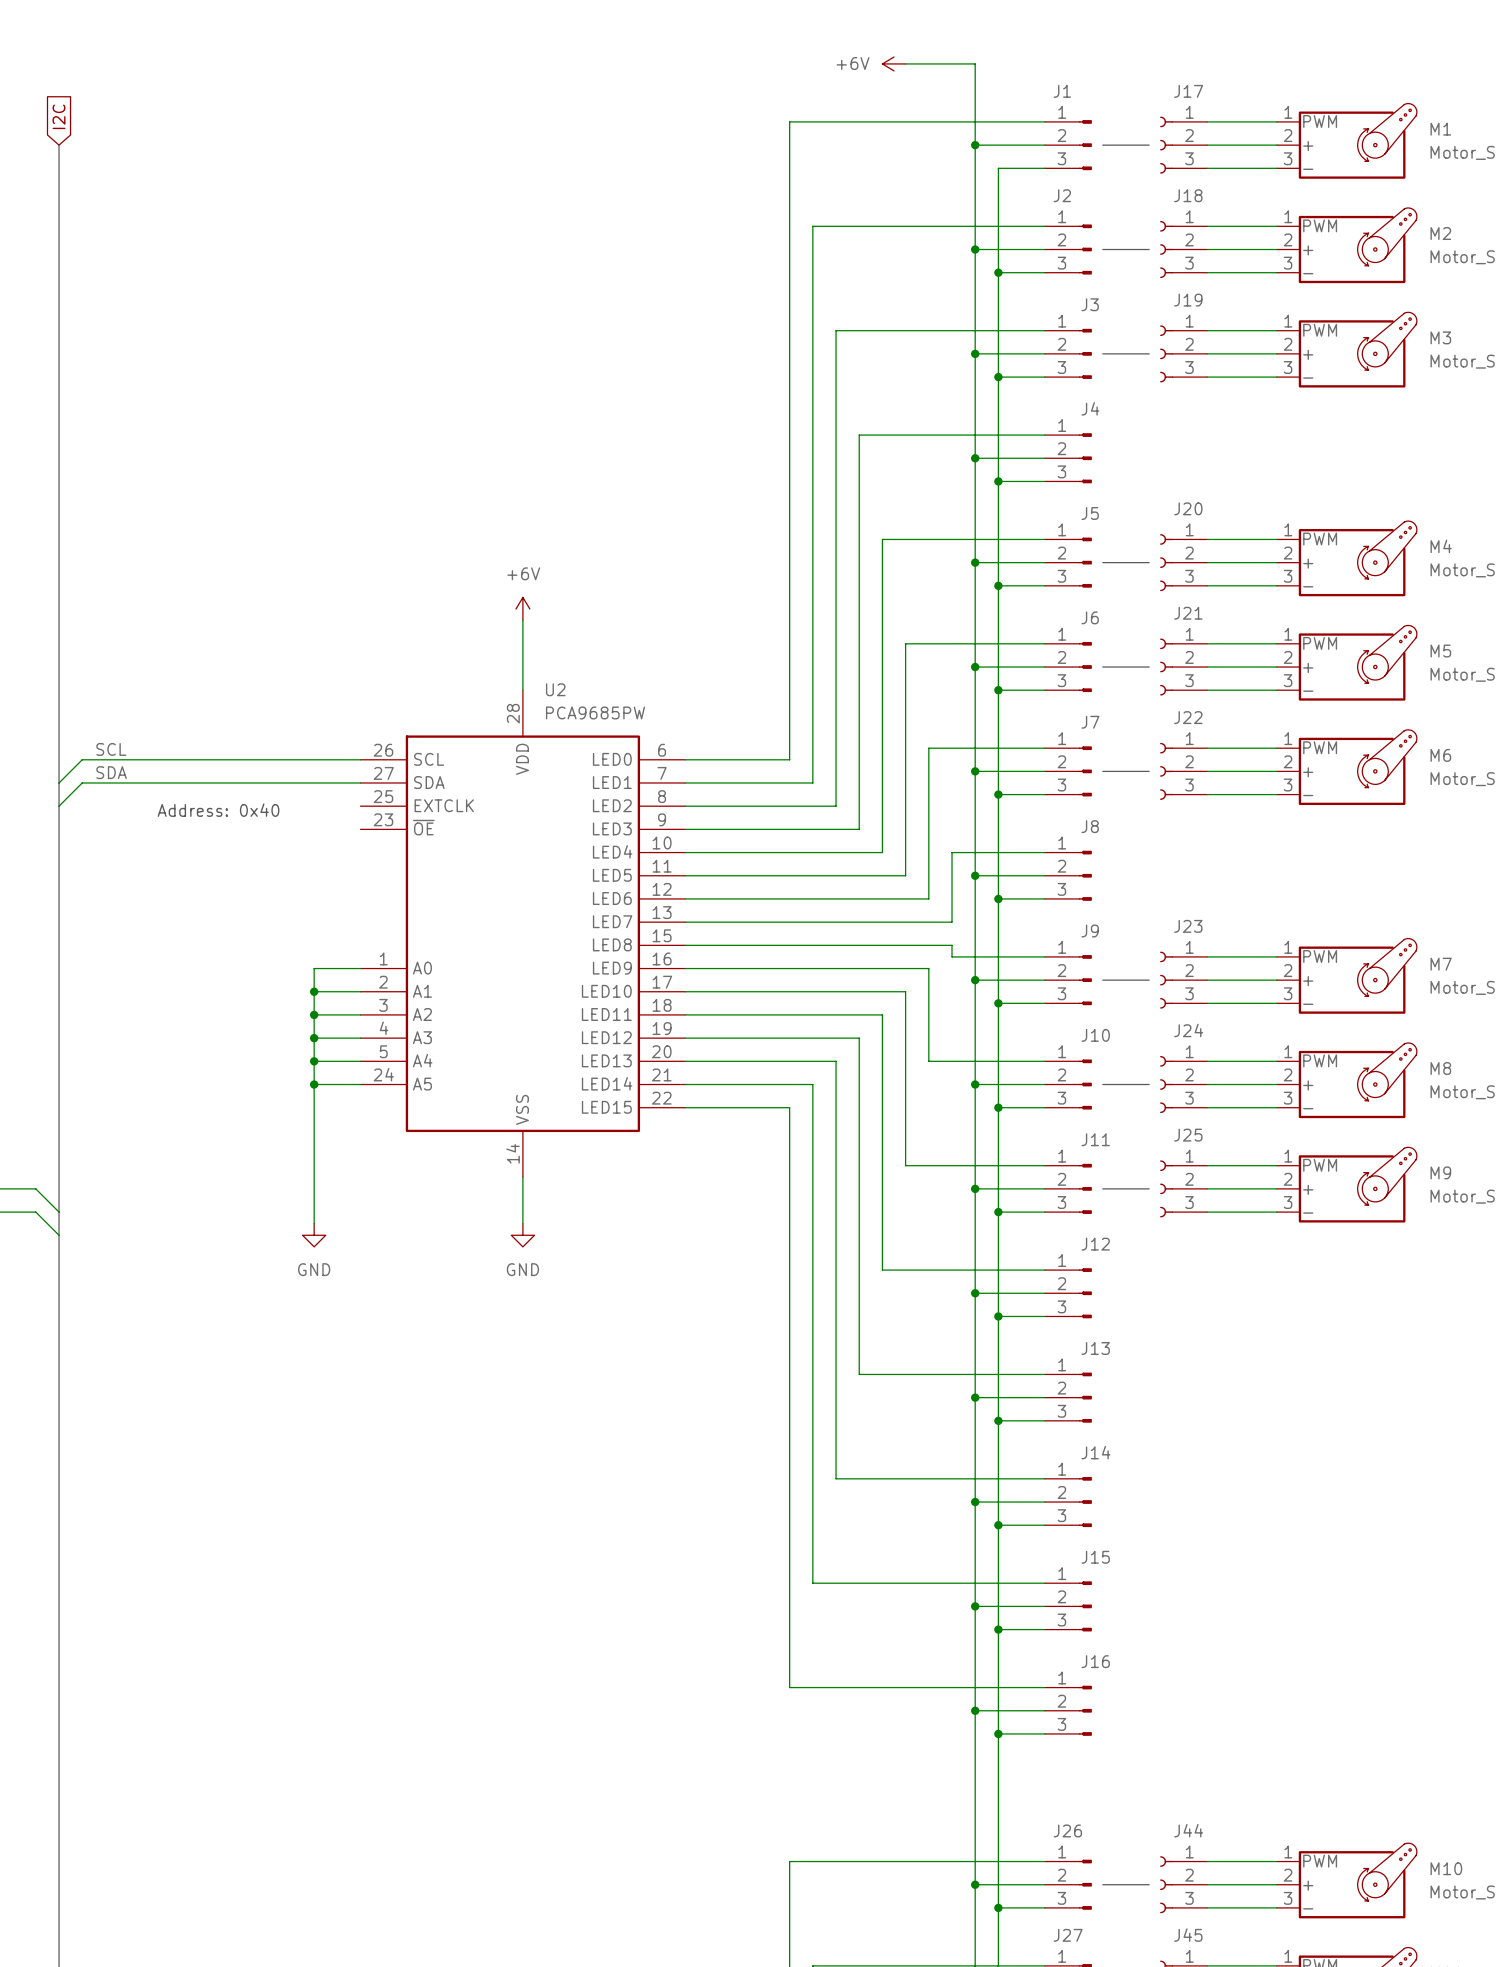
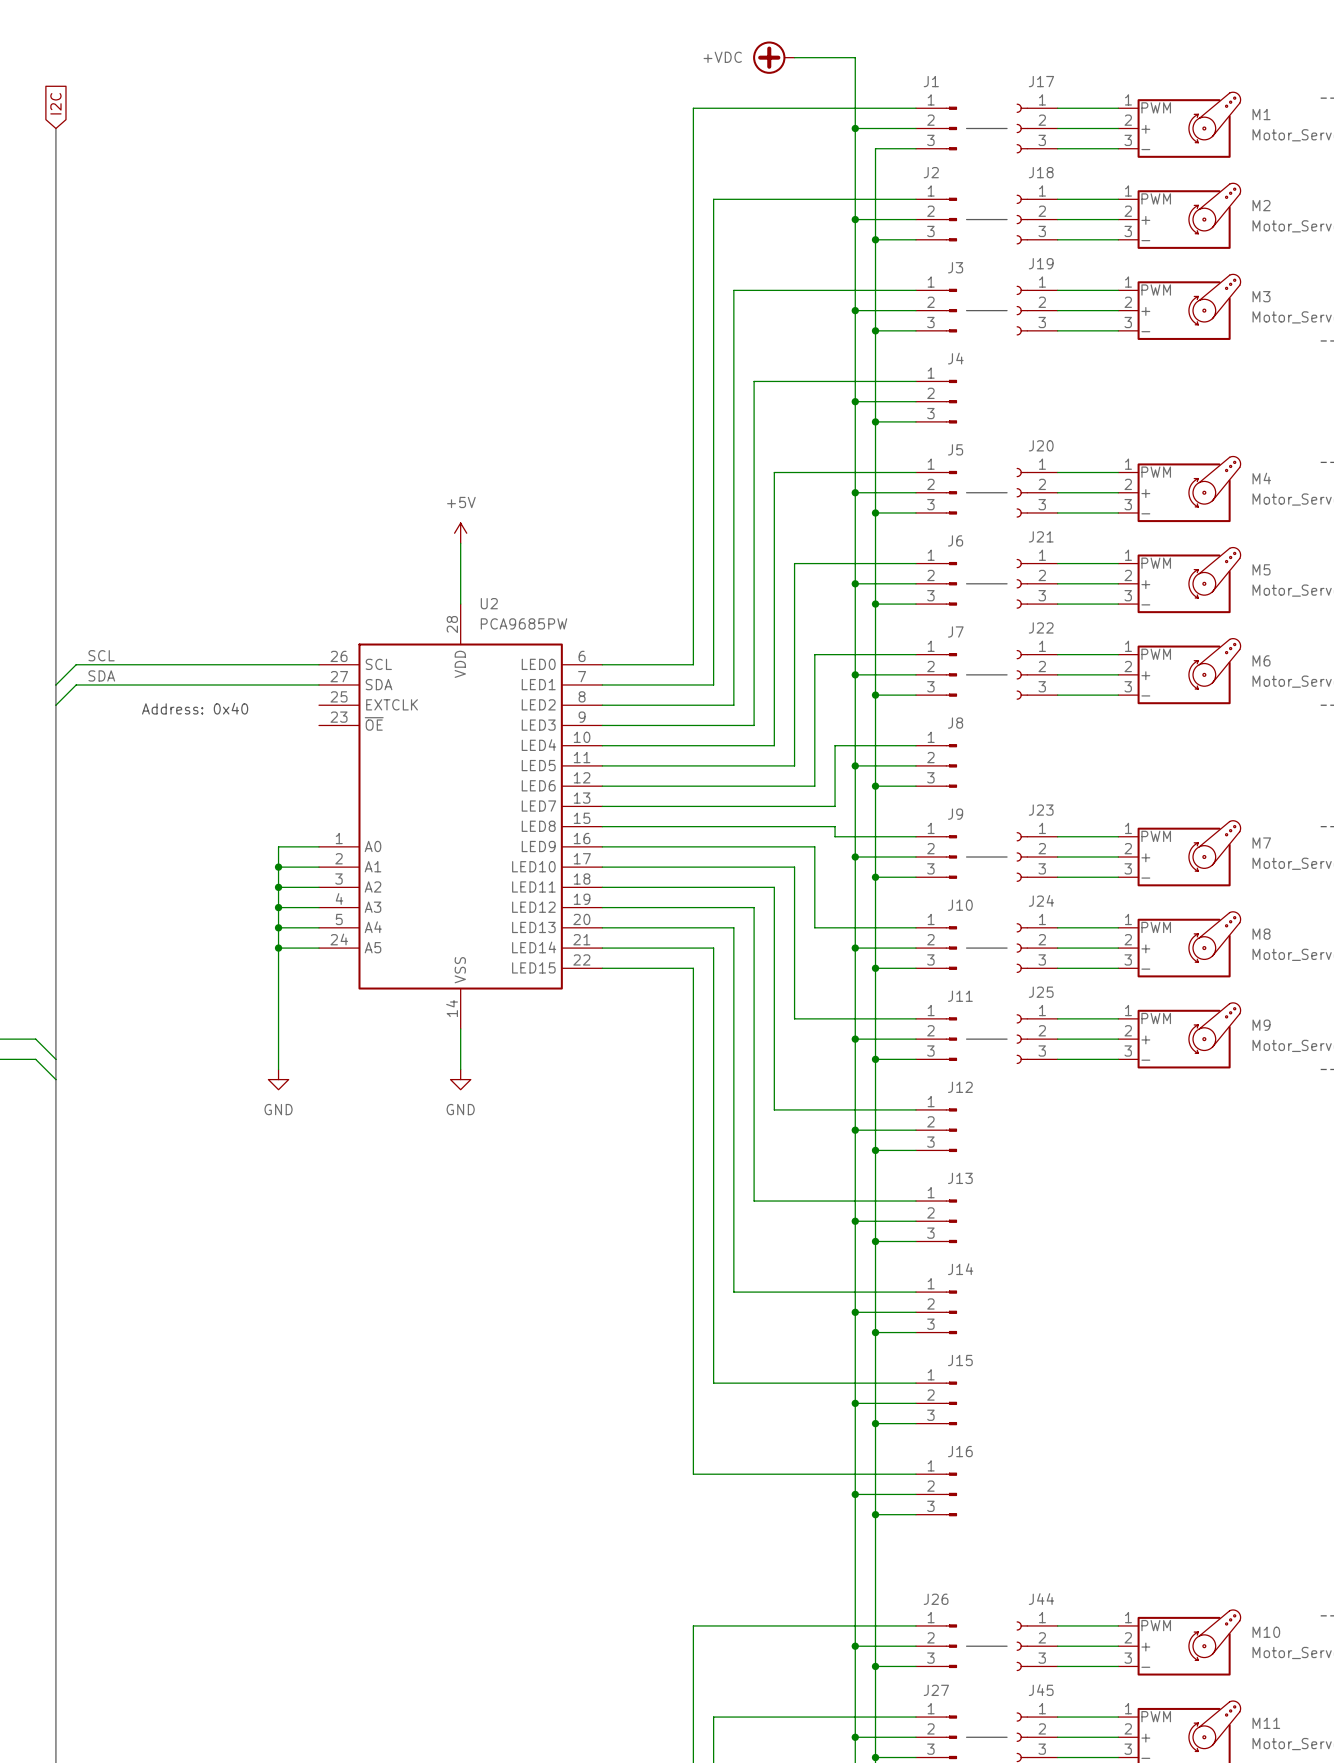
power symbol: none -> +VDC (773, 57)
power symbol: +6V (894, 63) -> none
power symbol: +6V (522, 609) -> +5V (460, 533)

